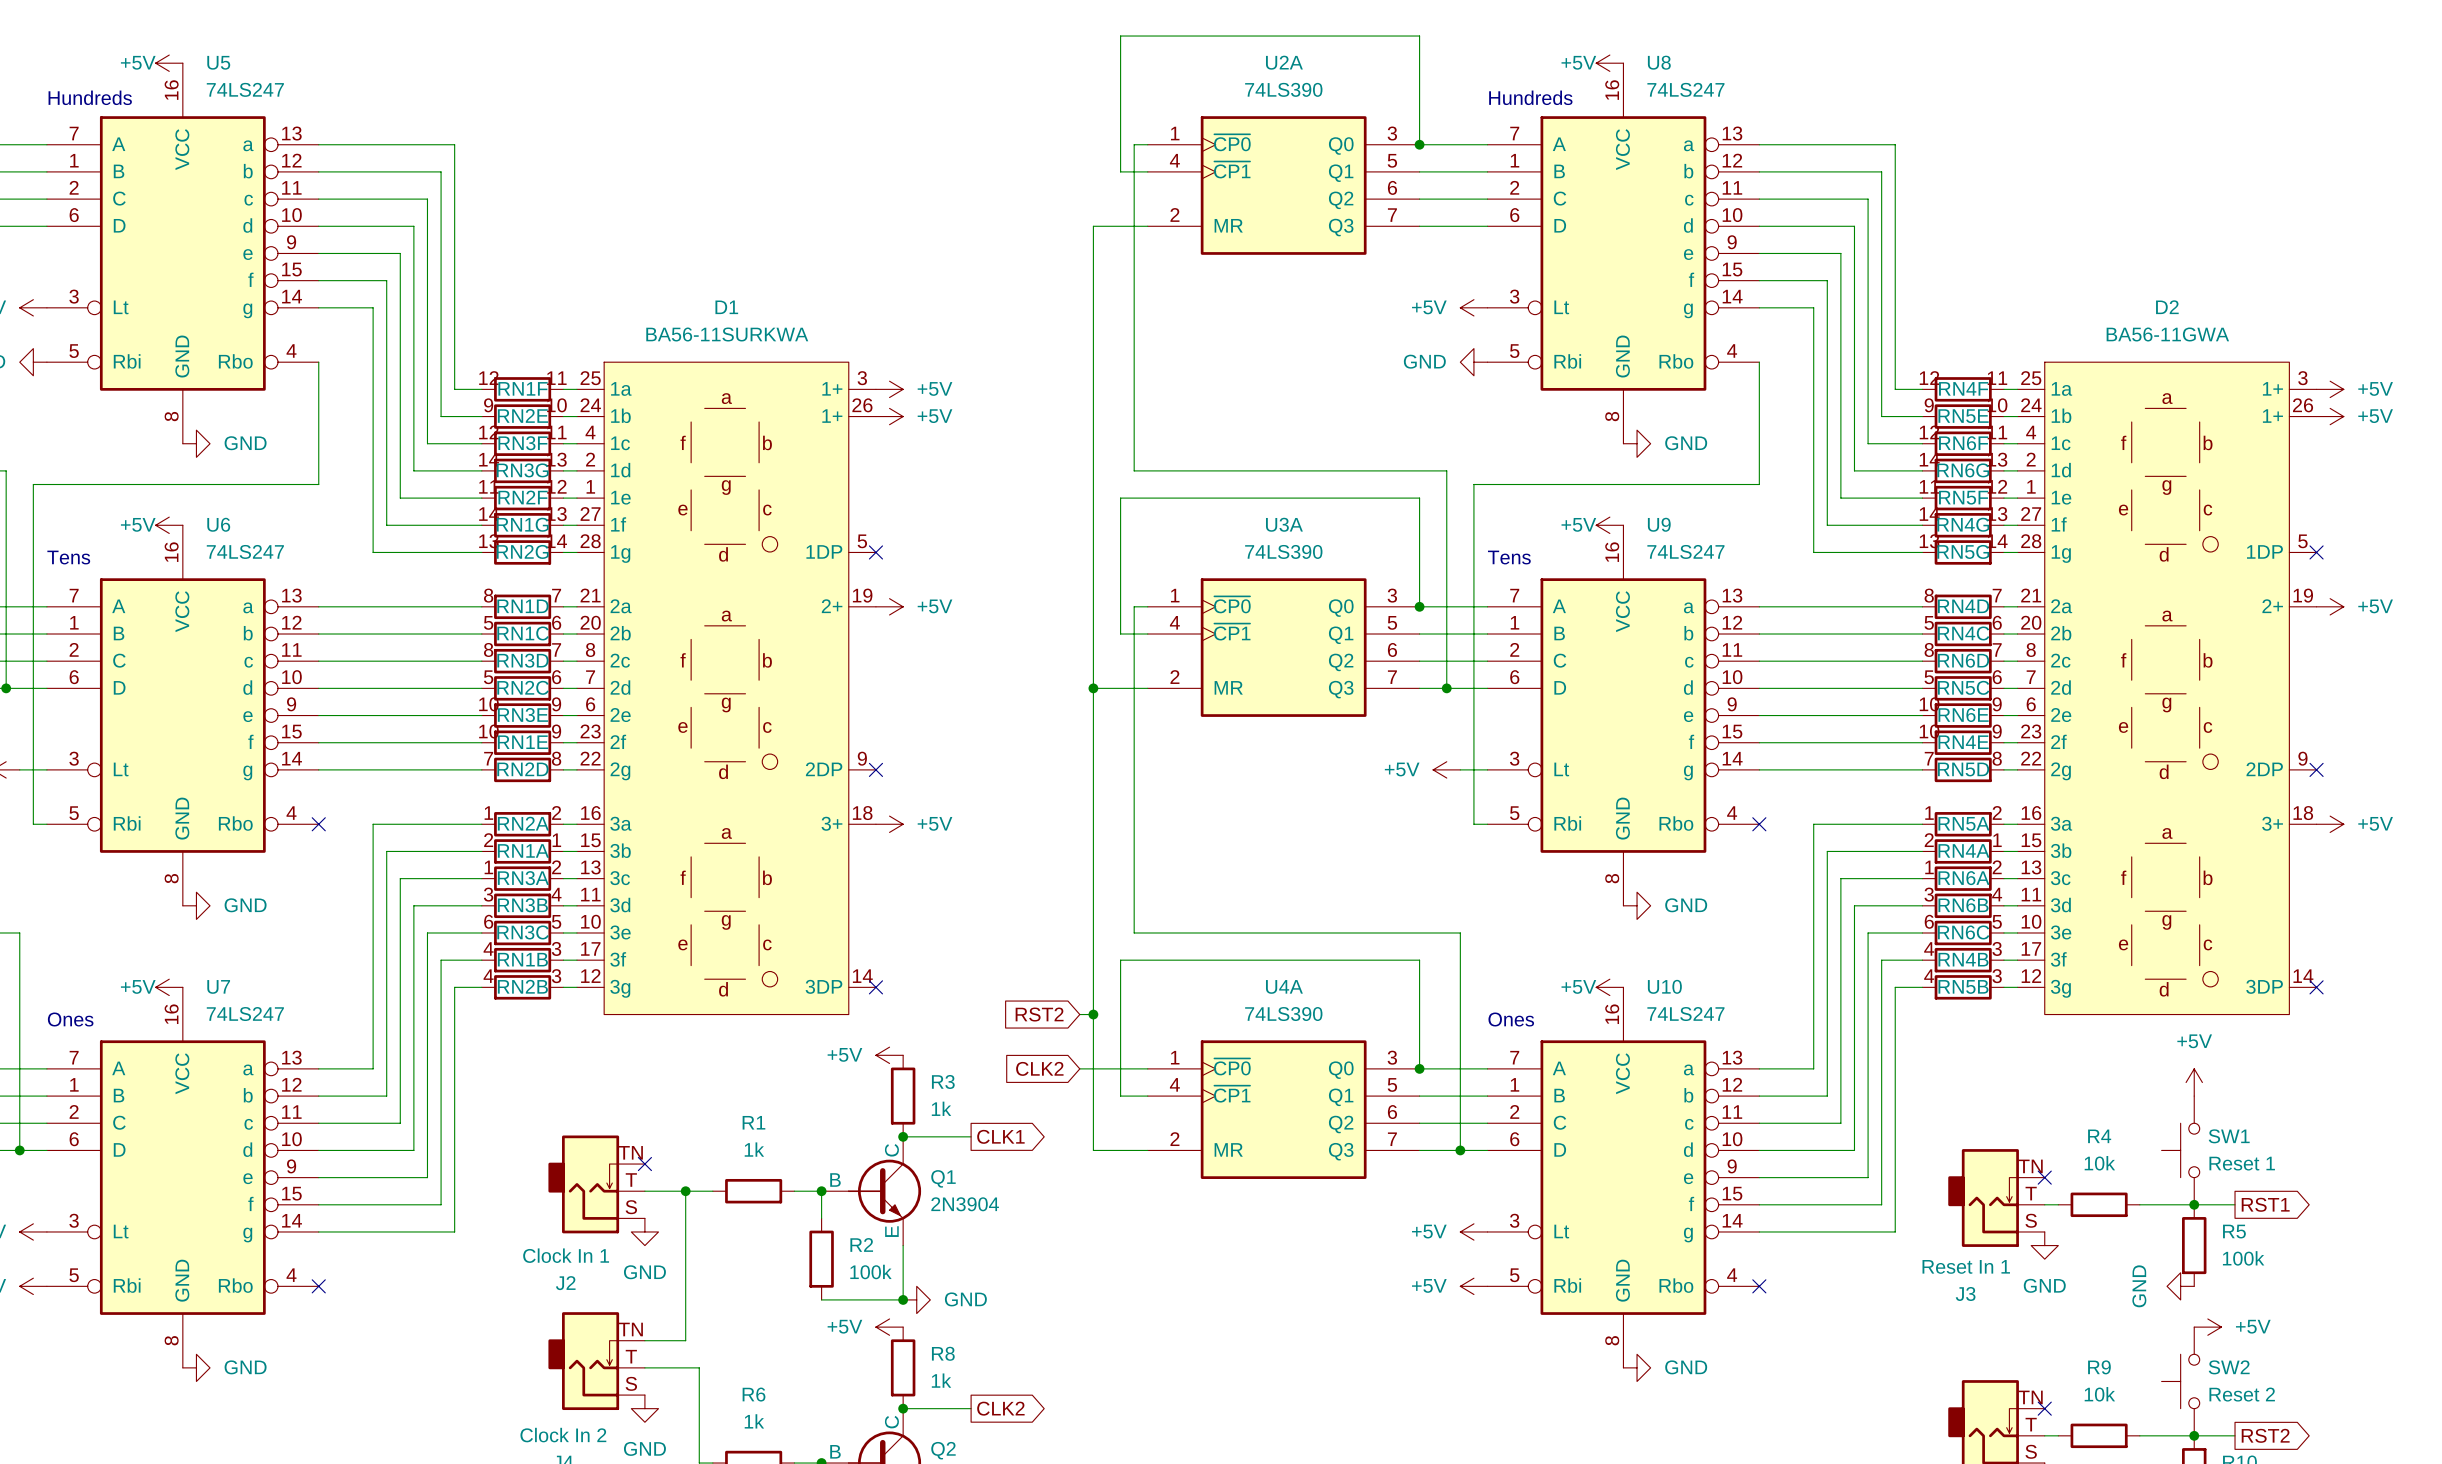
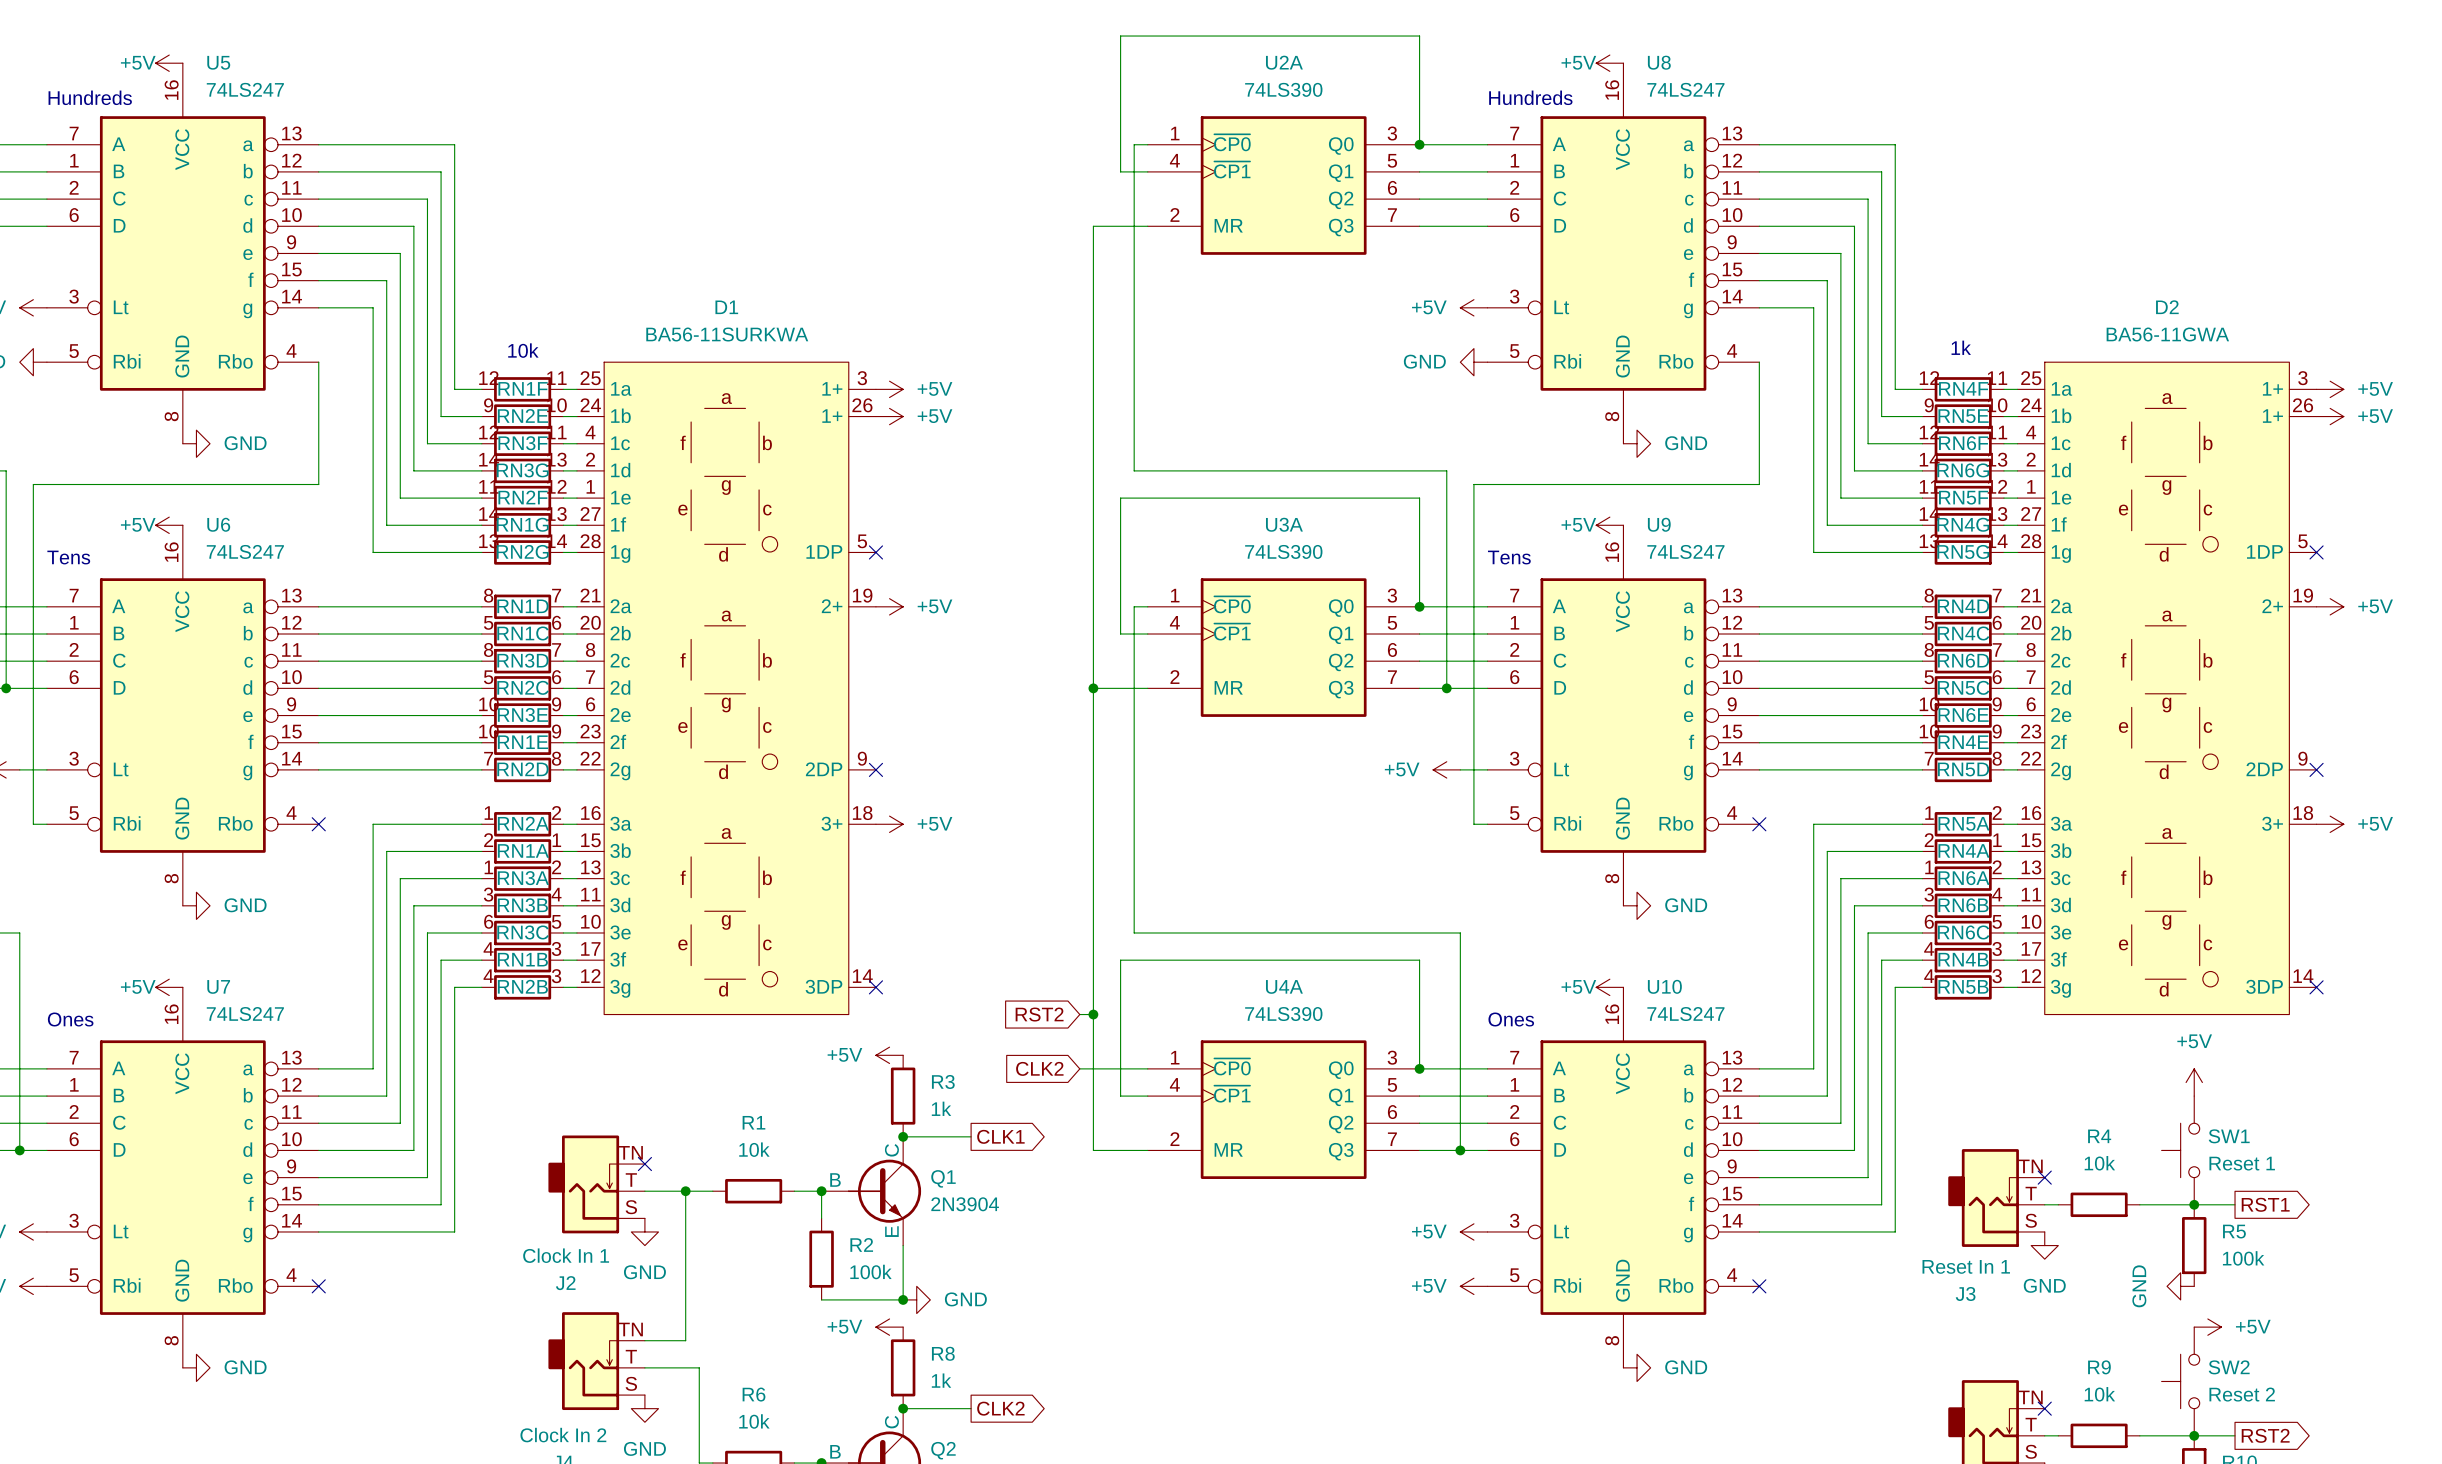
text: none -> 1k (1961, 347)
text: none -> 10k (523, 350)
R1 value: 1k (754, 1149) -> 10k (754, 1149)
R6 value: 1k (754, 1421) -> 10k (754, 1421)

